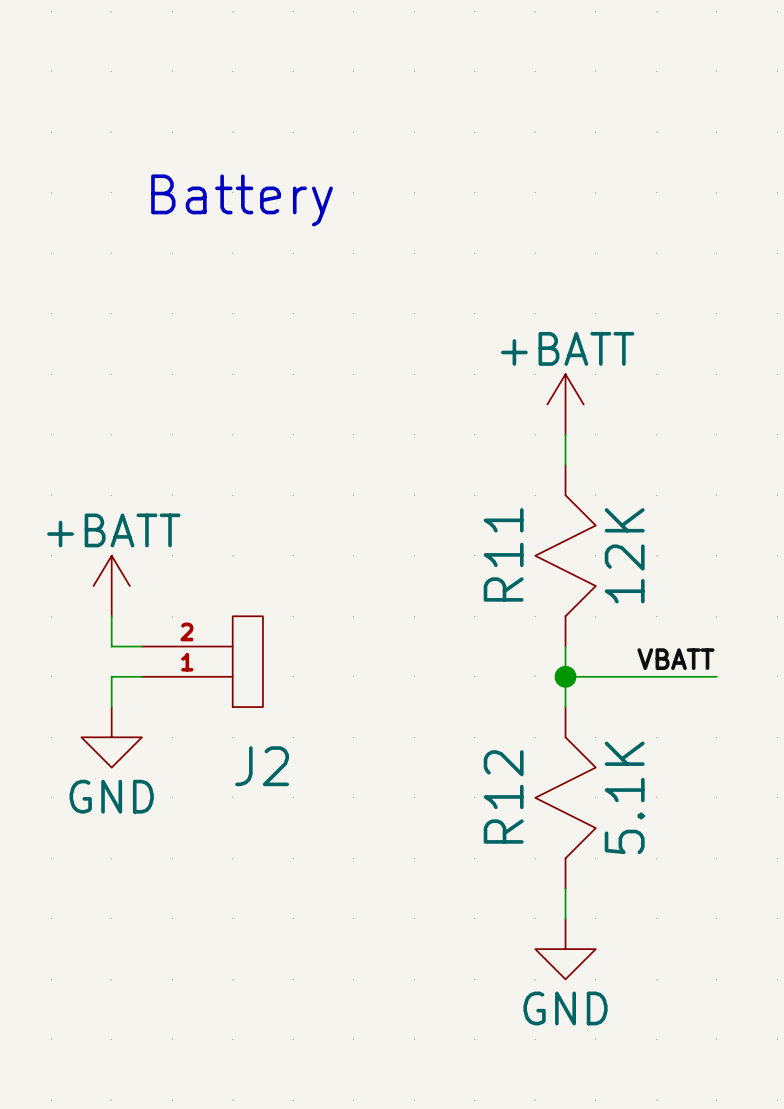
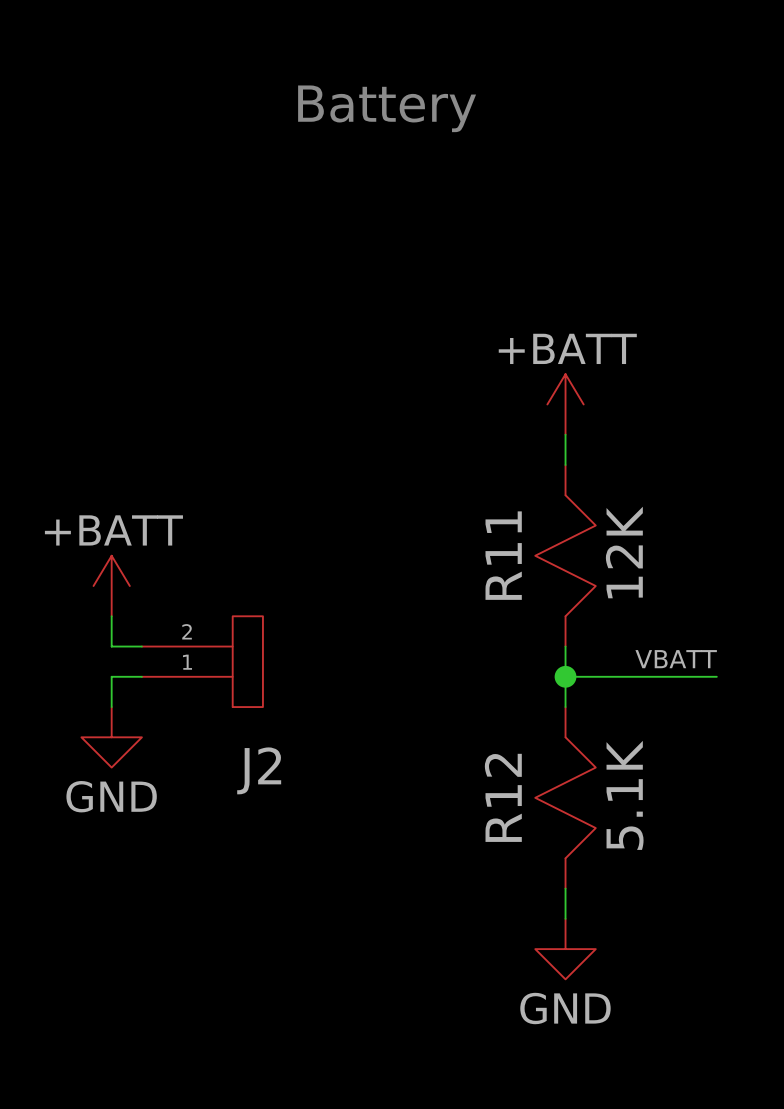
text position: Battery (242, 200) -> Battery (387, 108)

